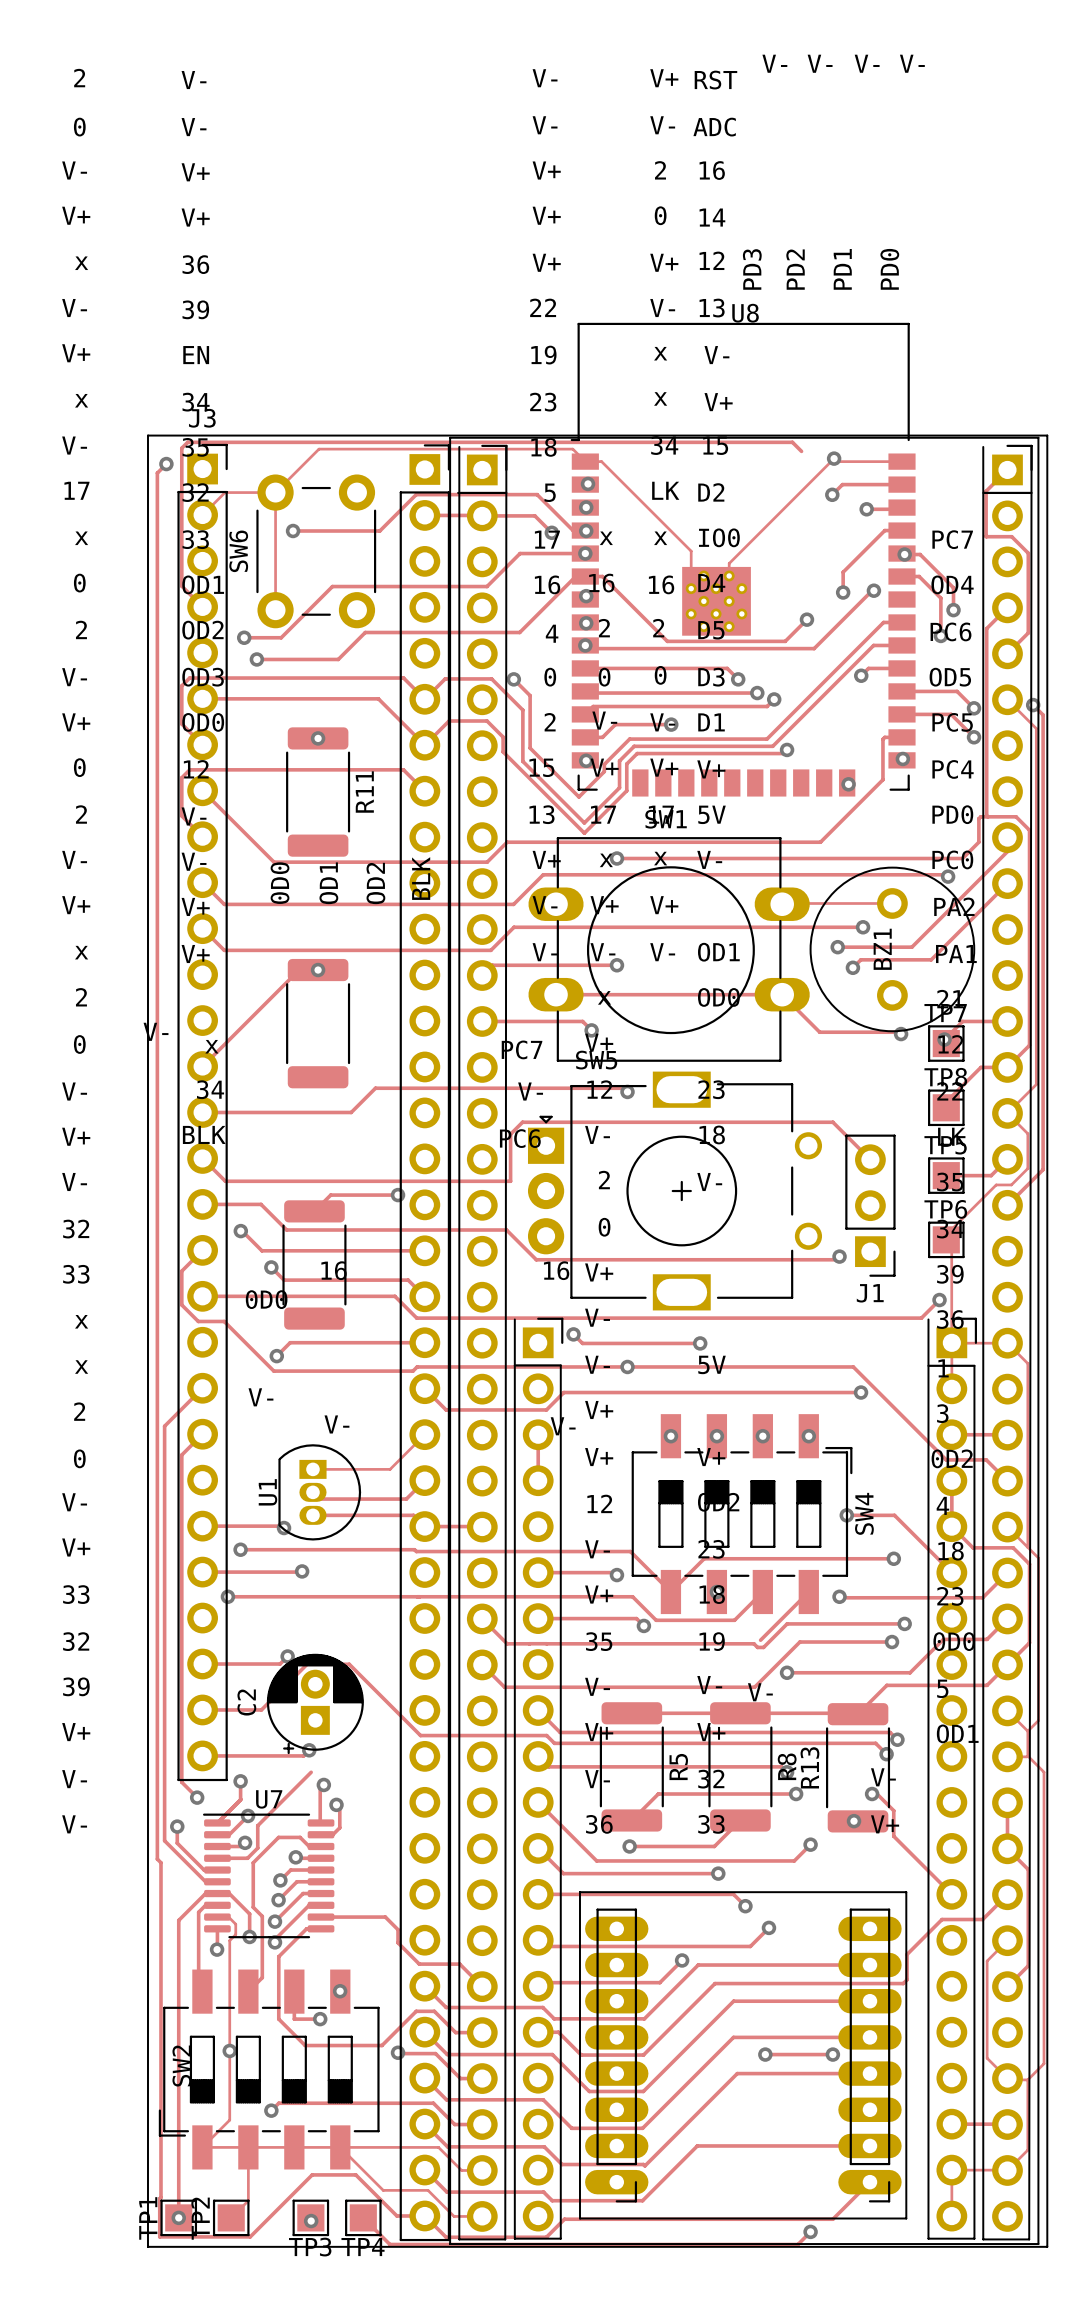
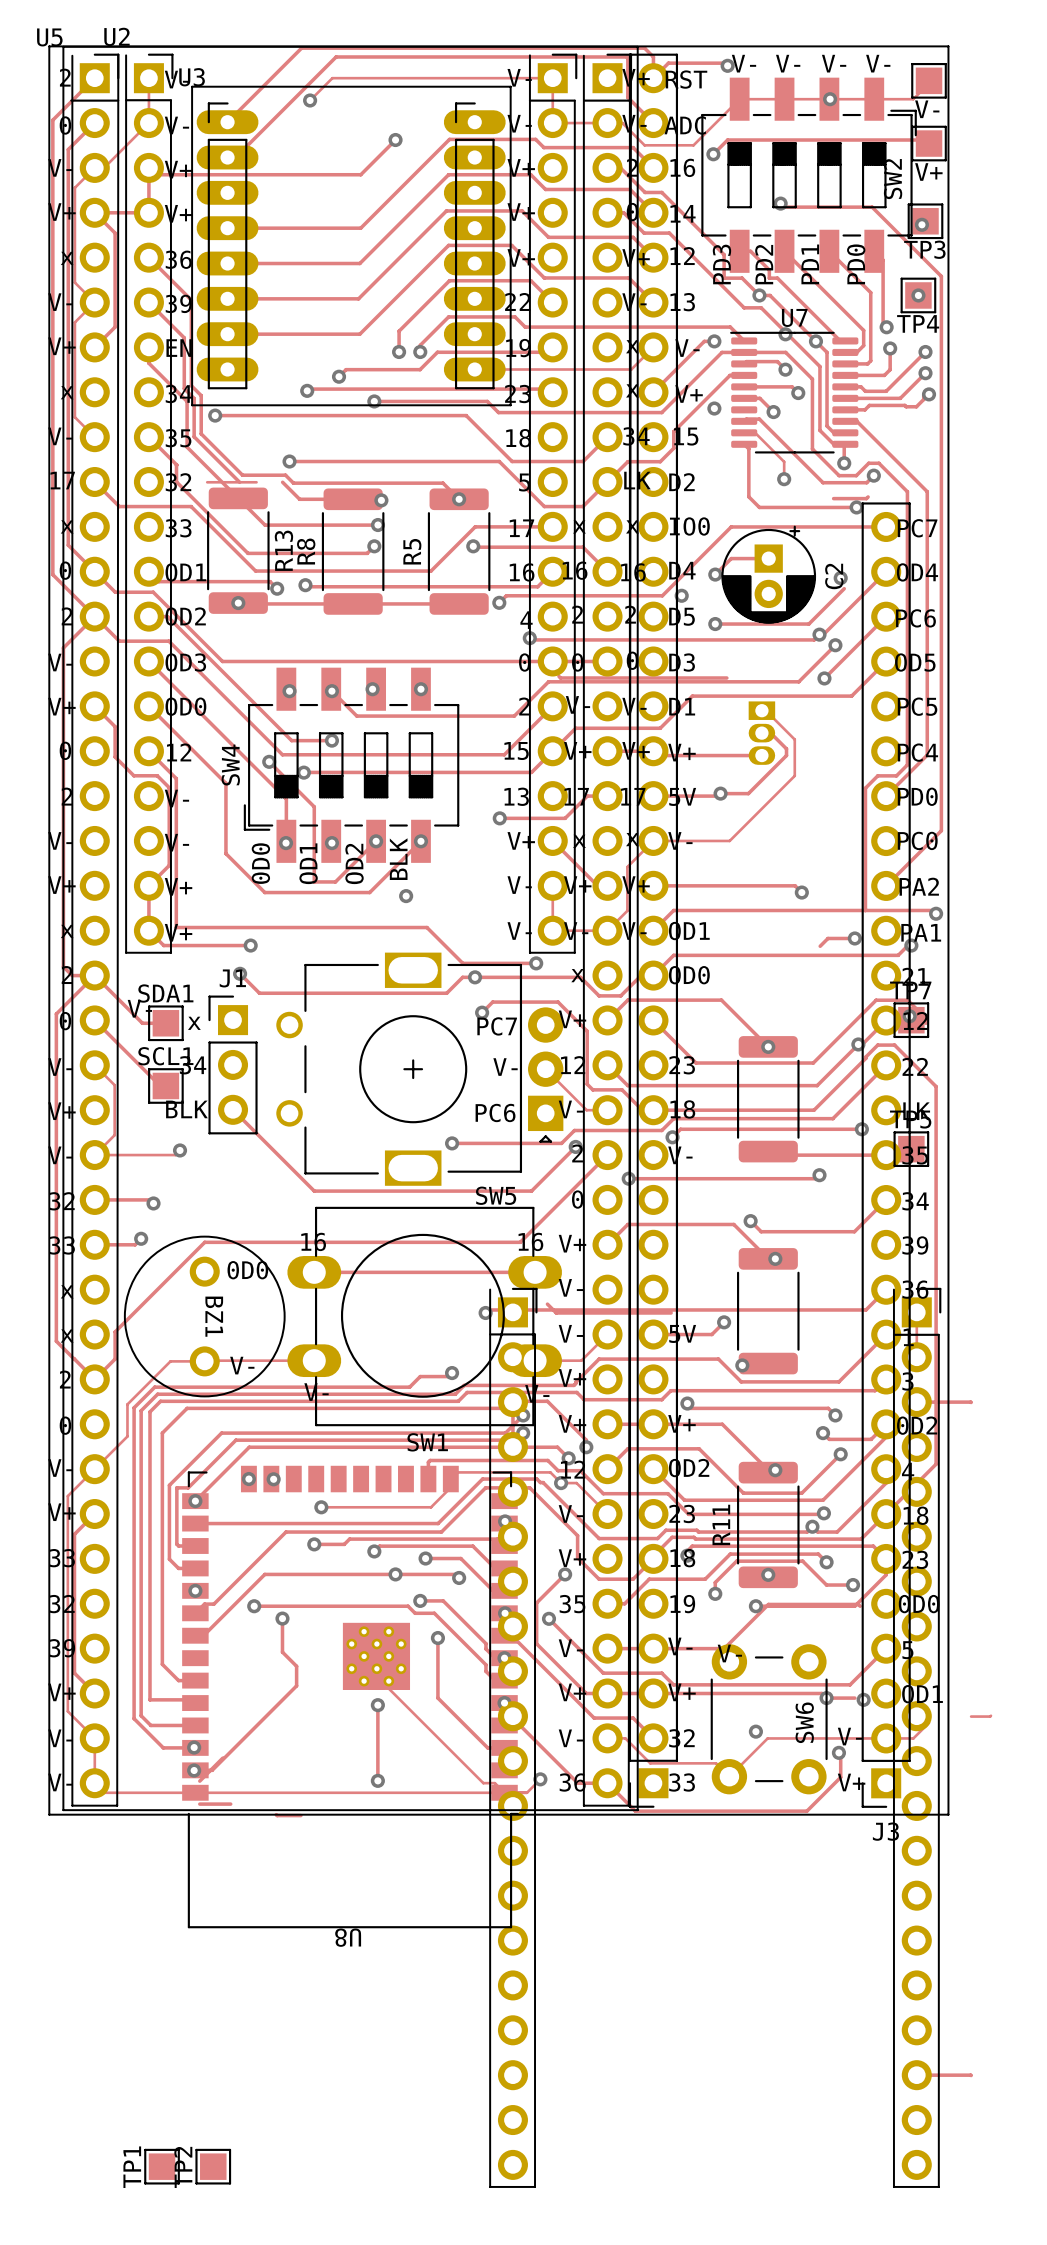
track: none -> (727, 65) (725, 63) (668, 63) (653, 78) (653, 56) (644, 48) (301, 48) (227, 122)
via: none -> (727, 65)
track: none -> (94, 78) (52, 120) (52, 574) (119, 641) (168, 641) (282, 754) (504, 754) (552, 706)
track: none -> (148, 78) (148, 123) (104, 167) (94, 167) (74, 187) (74, 282) (94, 302) (74, 322) (74, 417) (94, 437)
V-: none -> (929, 80)
track: none -> (929, 83) (913, 99) (739, 99) (693, 145) (644, 145) (622, 123) (552, 123) (552, 78) (332, 78) (310, 100)
via: none -> (830, 99)
via: none -> (310, 100)
track: none -> (94, 123) (68, 149) (68, 545) (115, 592) (153, 592) (222, 661) (607, 661)
track: none -> (653, 123) (627, 97) (626, 56) (336, 56) (235, 157) (227, 157)
track: none -> (395, 140) (360, 174) (155, 174) (148, 167) (148, 212) (94, 212) (115, 233) (115, 327) (94, 347)
via: none -> (395, 140)
track: none -> (929, 140) (727, 140) (713, 154)
V+: none -> (929, 143)
via: none -> (713, 154)
track: none -> (607, 167) (620, 167) (645, 192) (661, 192) (724, 254) (724, 278) (742, 278) (759, 295) (770, 295) (827, 352) (827, 426) (833, 432) (845, 432)
track: none -> (653, 167) (633, 147) (543, 147) (535, 139) (449, 139) (360, 228) (227, 228)
track: none -> (780, 203) (784, 207) (872, 207) (941, 276) (941, 830) (886, 885)
via: none -> (780, 203)
track: none -> (607, 212) (623, 212) (644, 233) (669, 233) (744, 307) (761, 307) (819, 366) (819, 430) (833, 444) (845, 444) (844, 463)
track: none -> (653, 212) (630, 189) (545, 189) (530, 174) (448, 174) (359, 263) (227, 263)
via: none -> (921, 224)
U3: none -> (351, 246)
track: none -> (739, 251) (750, 251) (769, 270) (769, 278) (777, 278) (840, 340) (845, 340)
track: none -> (784, 251) (863, 330) (863, 345) (856, 352) (845, 352)
track: none -> (829, 251) (870, 292) (870, 360) (867, 363) (845, 363)
track: none -> (874, 251) (883, 260) (883, 323) (886, 327)
track: none -> (148, 257) (191, 300) (191, 385) (201, 395) (201, 433) (242, 475) (285, 475) (293, 483) (443, 483) (459, 499)
track: none -> (653, 257) (633, 237) (548, 237) (522, 210) (446, 210) (358, 298) (227, 298)
via: none -> (759, 295)
via: none -> (918, 295)
track: none -> (148, 302) (184, 337) (184, 388) (194, 398) (194, 436) (239, 482)
track: none -> (552, 302) (530, 280) (449, 280) (399, 331) (399, 351)
track: none -> (653, 302) (628, 277) (544, 277) (511, 245) (448, 245) (359, 334) (227, 334)
via: none -> (886, 327)
via: none -> (785, 334)
track: none -> (744, 340) (730, 327) (525, 327) (515, 316) (448, 316) (420, 345) (420, 351)
track: none -> (714, 341) (704, 341) (653, 392)
via: none -> (714, 341)
via: none -> (815, 341)
track: none -> (148, 347) (148, 363) (187, 401) (187, 447) (265, 525) (377, 525)
track: none -> (552, 347) (547, 352) (437, 352) (420, 369) (346, 369) (339, 376)
track: none -> (653, 347) (631, 369) (474, 369)
track: none -> (890, 348) (890, 369) (884, 375) (845, 375)
via: none -> (890, 348)
via: none -> (399, 351)
via: none -> (420, 351)
track: none -> (925, 351) (886, 391) (865, 391) (861, 386) (845, 386)
via: none -> (925, 351)
track: none -> (744, 363) (746, 361) (777, 361) (785, 369)
via: none -> (785, 369)
track: none -> (925, 373) (900, 398) (845, 398)
via: none -> (925, 373)
track: none -> (744, 375) (730, 375) (673, 431) (673, 448) (660, 461) (627, 461) (582, 506) (544, 506) (499, 461) (289, 461)
via: none -> (339, 376)
track: none -> (744, 386) (792, 386) (798, 393)
track: none -> (307, 390) (308, 389) (549, 389) (552, 392)
via: none -> (307, 390)
via: none -> (798, 393)
track: none -> (929, 394) (923, 394) (923, 399) (916, 406) (869, 405) (864, 409) (845, 409)
via: none -> (929, 394)
track: none -> (744, 398) (759, 398) (773, 412)
track: none -> (374, 401) (487, 401) (498, 412) (661, 412) (722, 352) (785, 352) (812, 379) (812, 448) (839, 475) (856, 475) (868, 463) (878, 463) (907, 491) (907, 764) (896, 775) (877, 775) (865, 788) (865, 910)
via: none -> (374, 401)
via: none -> (714, 408)
via: none -> (773, 412)
track: none -> (215, 415) (466, 415) (512, 461) (583, 461) (607, 437)
via: none -> (215, 415)
track: none -> (744, 421) (746, 419) (759, 419) (823, 482) (866, 482) (873, 475)
track: none -> (845, 421) (856, 421) (927, 491) (927, 755) (886, 796)
board edge: (147, 435) (1047, 435) (1047, 2246) (147, 2246) (147, 435) -> (49, 46) (49, 1814) (948, 1814) (948, 46) (49, 46)
track: none -> (744, 432) (755, 432) (784, 461) (784, 479)
track: none -> (148, 437) (176, 465) (176, 481) (247, 553) (367, 553) (374, 546)
track: (801, 451) (792, 442) (187, 442) (181, 448) (181, 586) (202, 606) -> none
track: none -> (744, 444) (748, 448) (748, 496) (759, 507) (856, 507)
via: (834, 458) -> none
track: (902, 461) (837, 461) (834, 458) (729, 563) (729, 575) -> none
track: (166, 464) (157, 473) (157, 1443) -> (886, 1334) (838, 1381) (741, 1381) (718, 1359) (599, 1359) (573, 1385) (464, 1385) (455, 1394) (157, 1394) (141, 1410)
via: (166, 464) -> none
track: (1007, 469) (986, 491) (986, 536) (1011, 536) (1028, 553) (1028, 632) (1007, 653) -> none
via: none -> (289, 461)
via: none -> (844, 463)
via: (588, 483) -> none
track: (902, 484) (842, 484) (832, 494) -> none
via: none -> (873, 475)
track: none -> (94, 482) (119, 506) (191, 506) (255, 571) (431, 571) (475, 526) (552, 526)
track: (225, 492) (202, 515) -> none
track: none -> (282, 482) (299, 499) (381, 500)
via position: (832, 494) -> (784, 479)
via: (586, 507) -> none
via: none -> (459, 499)
via: (866, 509) -> none
via: none -> (381, 500)
U2: none -> (351, 503)
track: (424, 515) (534, 515) (551, 532) -> none
via: none -> (856, 507)
track: (293, 530) (379, 530) (416, 494) (537, 494) (573, 530) (586, 530) -> none
via: (293, 530) -> none
via: (586, 530) -> none
track: (902, 530) (884, 530) (843, 572) (843, 592) -> none
via: (551, 532) -> none
via: none -> (377, 525)
track: none -> (886, 526) (731, 526) (662, 595) (506, 595) (499, 602)
SW6 name position: SW6 (238, 551) -> SW6 (804, 1722)
SW6 position: (316, 551) -> (769, 1719)
track: (585, 553) (520, 553) (487, 586) (332, 586) (281, 637) (244, 637) -> none
via: (585, 553) -> none
track: (904, 554) (920, 554) (953, 587) (953, 610) -> none
via: (904, 554) -> none
via: none -> (374, 546)
track: none -> (473, 546) (582, 547) (607, 571)
via: none -> (473, 546)
U8 rotation: 0° (743, 559) -> 180° (350, 1697)
U8 position: (743, 559) -> (350, 1697)
track: none -> (768, 558) (731, 558) (715, 574)
track: (691, 575) (691, 551) (601, 461) (585, 461) (572, 449) (319, 449) (275, 492) (275, 610) -> none
track: (902, 576) (919, 576) (940, 598) (940, 635) -> none
track: none -> (148, 571) (158, 581) (270, 581) (277, 588)
track: none -> (552, 571) (537, 586) (307, 586) (305, 585)
track: none -> (886, 571) (823, 634) (819, 634) (814, 639) (531, 639) (529, 638)
via: none -> (715, 574)
track: (873, 590) (814, 648) (588, 648) (585, 645) (575, 645) -> none
via: (843, 592) -> none
via: (586, 596) -> none
via: none -> (305, 585)
via: none -> (277, 588)
track: none -> (844, 588) (808, 624) (715, 624)
track: (1007, 607) (986, 628) (987, 816) -> none
via: none -> (681, 595)
via: (953, 610) -> none
track: none -> (238, 603) (459, 603)
via: none -> (238, 603)
via: none -> (499, 602)
track: (806, 619) (785, 641) (667, 641) (602, 576) (575, 576) (519, 632) (365, 632) (338, 659) (256, 659) -> none
via: (806, 619) -> none
track: (902, 622) (883, 622) (766, 739) (629, 739) (604, 764) (604, 771) (578, 796) (530, 748) (530, 695) (513, 679) -> none
via: (586, 623) -> none
track: none -> (94, 616) (63, 647) (63, 966) (72, 975) (94, 975)
track: none -> (148, 616) (167, 616) (291, 740) (331, 740)
track: none -> (886, 616) (821, 681)
via: (940, 635) -> none
via: (244, 637) -> none
via: none -> (715, 624)
via: (585, 645) -> none
track: (902, 645) (873, 645) (772, 746) (634, 746) (619, 760) (619, 787) (584, 822) (522, 761) (522, 710) (491, 678) (445, 678) (424, 699) (403, 678) (189, 678) (181, 685) (181, 723) (202, 744) -> none
via: none -> (819, 634)
via: none -> (529, 638)
via: (256, 659) -> none
track: none -> (835, 645) (798, 681) (548, 681) (514, 716) (356, 716) (331, 689)
via: none -> (835, 645)
track: (585, 668) (727, 668) (738, 679) -> none
track: (902, 668) (868, 668) (861, 675) -> none
via: (861, 675) -> none
track: none -> (148, 661) (286, 798) (286, 843)
track: none -> (886, 661) (851, 696) (692, 696) (660, 728) (575, 728) (531, 772) (304, 772)
via: (513, 679) -> none
via: (738, 679) -> none
track: (902, 691) (957, 691) (974, 708) -> none
via: (757, 693) -> none
via: none -> (824, 678)
track: (202, 698) (378, 698) (424, 745) (449, 720) (487, 720) (503, 737) (503, 751) (584, 833) (626, 790) (626, 763) (637, 753) (783, 753) (787, 749) -> none
track: (774, 699) (767, 706) (593, 706) (585, 714) -> none
via: (774, 699) -> none
track: (1007, 699) (1036, 728) (1036, 1084) (1007, 1113) (1027, 1133) (1027, 1168) (1011, 1184) (996, 1184) (946, 1234) (946, 1239) -> none
via: none -> (372, 689)
via: none -> (420, 689)
track: (1033, 705) (1043, 715) (1043, 1169) (1007, 1205) -> none
via: (1033, 705) -> none
via: none -> (289, 691)
via: none -> (331, 691)
via: (974, 708) -> none
track: (902, 714) (951, 714) (974, 737) -> none
track: none -> (94, 706) (115, 726) (115, 756) (133, 775) (157, 775) (169, 787) (169, 865) (148, 885) (148, 930) (163, 945) (250, 945)
track: none -> (148, 706) (225, 783) (225, 853) (264, 892) (369, 892) (420, 841)
track: (671, 724) (615, 724) (602, 737) (585, 737) -> none
via: (671, 724) -> none
track: none -> (761, 710) (765, 710) (794, 739) (794, 775) (729, 840) (653, 840) (627, 867) (627, 910) (607, 930) (552, 930) (552, 885)
track: (902, 737) (884, 737) (882, 739) (882, 779) (820, 842) (507, 842) (487, 862) (273, 862) (202, 790) -> none
via: (974, 737) -> none
via: (318, 738) -> none
via: (787, 749) -> none
track: none -> (761, 733) (770, 733) (786, 748) (786, 755) (748, 793) (720, 793) (718, 796) (653, 796)
part: none -> (761, 733)
via: none -> (331, 740)
via: (902, 758) -> none
via: (586, 760) -> none
track: none -> (148, 751) (176, 778) (176, 927) (426, 927) (462, 963) (536, 963)
track: none -> (607, 751) (653, 751) (657, 755) (761, 755)
track: none -> (269, 761) (314, 806) (314, 881) (335, 881) (376, 841)
via: none -> (269, 761)
via: (848, 784) -> none
via: none -> (303, 772)
track: (424, 791) (403, 769) (189, 769) (181, 777) (181, 815) (202, 836) -> none
R11 position: (318, 792) -> (768, 1524)
R11 name position: R11 (364, 792) -> R11 (721, 1524)
via: none -> (720, 793)
track: none -> (607, 796) (587, 796) (565, 818) (499, 818)
via: none -> (499, 818)
track: (1007, 837) (1007, 851) (911, 947) (837, 947) -> none
track: (616, 858) (962, 858) (978, 842) (978, 818) (980, 816) (1016, 816) (1029, 830) (1029, 1045) (1007, 1067) (980, 1067) (940, 1107) -> none
via: (616, 858) -> none
track: none -> (552, 840) (597, 885) (607, 885)
via: none -> (376, 841)
via: none -> (420, 841)
via: none -> (286, 843)
via: none -> (331, 843)
track: (948, 874) (543, 874) (513, 904) (224, 904) (202, 882) -> none
via: (948, 876) -> none
track: (1007, 883) (931, 959) (888, 959) -> none
track: (892, 903) (782, 904) -> none
track: none -> (653, 885) (795, 885) (801, 892)
via: none -> (801, 892)
via: none -> (406, 896)
track: (863, 927) (514, 927) (490, 950) (224, 950) (202, 928) -> none
via: (863, 927) -> none
track: none -> (936, 913) (932, 910) (673, 910) (653, 930)
via: none -> (936, 913)
via: (837, 947) -> none
U5: none -> (350, 928)
SW1 rotation: 0° (669, 949) -> 180° (424, 1316)
SW1 position: (669, 949) -> (424, 1316)
BZ1 name rotation: 0° (882, 949) -> 180° (214, 1316)
BZ1 position: (892, 949) -> (204, 1316)
part: none -> (653, 930)
via: none -> (854, 938)
track: (616, 965) (492, 965) (482, 975) -> none
via: (616, 965) -> none
via: none -> (250, 945)
via: (852, 967) -> none
track: none -> (911, 945) (908, 945) (898, 955) (673, 955) (653, 975) (641, 975) (620, 995) (599, 995) (580, 977) (462, 977) (446, 993) (259, 993) (240, 973)
via: none -> (911, 945)
track: (318, 970) (299, 970) (202, 1066) -> none
via: (318, 970) -> none
via: none -> (536, 963)
track: (556, 994) (782, 994) (819, 1032) (899, 1032) (901, 1034) -> none
via: none -> (240, 973)
track: none -> (94, 975) (142, 1023) (165, 1023)
track: none -> (94, 975) (56, 1014) (56, 1341) (74, 1359)
via: none -> (475, 977)
track: (482, 1021) (582, 1021) (591, 1030) -> none
track: (1007, 1021) (962, 1021) (940, 1043) -> none
part: (318, 1023) -> none
via: (591, 1030) -> none
via position: (901, 1034) -> (858, 1044)
track: none -> (482, 1012) (492, 1002) (558, 1002) (587, 1031) (587, 1084) (592, 1089) (622, 1089) (642, 1110) (814, 1110) (877, 1045) (894, 1045) (936, 1086) (936, 1464) (861, 1539) (695, 1539) (693, 1537) (672, 1537) (633, 1579) (599, 1579) (577, 1557) (577, 1535) (529, 1487) (485, 1487) (441, 1532) (286, 1532) (282, 1535)
via: none -> (482, 1012)
track: none -> (94, 1020) (160, 1085) (165, 1085)
track: none -> (607, 1020) (627, 1000) (721, 1000) (768, 1046)
track: none -> (653, 1020) (696, 1063) (813, 1063) (876, 1000) (907, 1000) (925, 1018) (925, 1023)
track: none -> (886, 1020) (862, 1044) (858, 1044) (817, 1085) (627, 1085) (607, 1065)
SDA1: none -> (165, 1023)
via: none -> (768, 1046)
track: none -> (94, 1065) (114, 1085) (114, 1135) (94, 1155) (175, 1155) (180, 1150)
track: none -> (886, 1065) (832, 1118) (673, 1118) (661, 1130) (574, 1130) (561, 1143) (452, 1143)
track: (627, 1091) (623, 1088) (375, 1088) (351, 1112) (202, 1112) -> none
via: (627, 1091) -> none
track: none -> (545, 1069) (586, 1110) (607, 1110)
TP8: (946, 1107) -> none
SCL1: none -> (165, 1085)
J3 rotation: 0° (202, 1112) -> 180° (886, 1155)
part: none -> (768, 1099)
track: none -> (233, 1109) (314, 1191) (531, 1191) (575, 1146)
track: none -> (861, 1129) (680, 1129) (672, 1137)
via: none -> (861, 1129)
track: (202, 1158) (225, 1181) (510, 1181) (510, 1134) (522, 1122) (832, 1122) (870, 1159) -> none
track: (1007, 1159) (991, 1175) (940, 1175) -> none
via: none -> (672, 1137)
via: none -> (575, 1146)
via: none -> (180, 1150)
track: none -> (768, 1151) (771, 1155) (886, 1155)
track: none -> (607, 1155) (520, 1242) (204, 1242) (115, 1331) (115, 1359) (94, 1379) (74, 1359)
SW5 rotation: 0° (675, 1191) -> 180° (419, 1069)
SW5 position: (675, 1191) -> (419, 1069)
track: (398, 1195) (330, 1195) (314, 1211) -> none
via position: (398, 1195) -> (452, 1143)
track: none -> (819, 1175) (815, 1178) (628, 1178)
via: none -> (819, 1175)
track: (202, 1204) (261, 1204) (286, 1229) (506, 1229) (536, 1259) (836, 1259) (839, 1256) -> none
via: none -> (628, 1178)
J1 rotation: 0° (870, 1205) -> 180° (233, 1064)
J1 position: (870, 1205) -> (233, 1064)
track: none -> (94, 1199) (149, 1199) (153, 1203)
track: none -> (886, 1200) (854, 1231) (761, 1231) (750, 1221)
via: none -> (153, 1203)
track: (240, 1231) (261, 1250) (424, 1250) -> none
via: (240, 1231) -> none
track: (940, 1239) (951, 1251) (951, 1342) (1007, 1343) (1027, 1363) (1027, 1547) -> none
TP6: (946, 1239) -> none
via: none -> (750, 1221)
track: (202, 1250) (181, 1271) (181, 1304) (198, 1321) (224, 1321) (273, 1371) (413, 1371) (417, 1366) (853, 1366) (946, 1459) (986, 1459) (1007, 1481) -> none
via: (839, 1256) -> none
part: (314, 1264) -> none
track: none -> (141, 1238) (135, 1244) (94, 1244)
via: none -> (141, 1238)
track: (271, 1267) (284, 1280) (408, 1280) (424, 1296) -> none
via: (271, 1267) -> none
track: none -> (607, 1244) (627, 1224) (733, 1224) (768, 1258) (775, 1258)
via: none -> (775, 1258)
track: (202, 1296) (394, 1296) (416, 1318) (921, 1318) (939, 1300) -> none
via: (939, 1300) -> none
track: none -> (314, 1272) (535, 1272)
track: none -> (886, 1289) (865, 1309) (488, 1309) (485, 1312)
via: (573, 1334) -> none
part: (744, 1340) -> none
part: none -> (768, 1311)
track: (424, 1342) (290, 1342) (276, 1356) -> none
part: (424, 1342) -> none
via: none -> (485, 1312)
via: (700, 1343) -> none
track: none -> (724, 1322) (711, 1334) (653, 1334)
via: none -> (724, 1322)
via: (276, 1356) -> none
track: none -> (607, 1334) (581, 1360) (535, 1360)
via: (627, 1366) -> none
track: (202, 1388) (164, 1426) (164, 1840) (205, 1881) (217, 1881) -> none
track: (424, 1388) (446, 1409) (546, 1409) (563, 1392) (861, 1392) -> none
track: none -> (205, 1360) (314, 1360)
via: (861, 1392) -> none
track: none -> (204, 1361) (170, 1361) (127, 1404) (127, 1436) (67, 1496) (67, 1711) (94, 1738) (94, 1783) (104, 1792) (526, 1792) (540, 1779)
via: none -> (742, 1365)
track: none -> (452, 1373) (448, 1376) (420, 1376) (409, 1387) (154, 1387) (134, 1407) (134, 1718) (163, 1747) (195, 1747)
via: none -> (452, 1373)
track: none -> (886, 1379) (874, 1390) (670, 1390) (661, 1399) (584, 1399) (576, 1392) (467, 1392) (458, 1401) (160, 1401) (149, 1411) (149, 1699) (192, 1699) (195, 1703)
track: (202, 1434) (181, 1455) (181, 1782) (197, 1797) -> none
track: (424, 1434) (390, 1469) (312, 1469) -> none
via: (670, 1436) -> none
via: (762, 1436) -> none
via: (808, 1436) -> none
track: none -> (688, 1408) (828, 1408) (835, 1415)
track: none -> (523, 1415) (505, 1433) (221, 1433) (169, 1485) (169, 1559) (178, 1568) (195, 1568)
via: none -> (523, 1415)
via: none -> (835, 1415)
track: none -> (607, 1424) (722, 1424) (768, 1470)
track: none -> (523, 1433) (516, 1440) (235, 1440) (188, 1487) (176, 1487) (176, 1544) (178, 1545) (195, 1545)
via: none -> (523, 1433)
track: none -> (823, 1433) (829, 1439) (871, 1439) (886, 1424) (886, 1437) (823, 1500) (684, 1500) (653, 1469)
via: none -> (823, 1433)
track: (424, 1480) (406, 1499) (319, 1499) (312, 1492) -> none
track: none -> (586, 1447) (586, 1440) (547, 1401) (519, 1401) (512, 1408) (187, 1408) (162, 1433) (162, 1664) (178, 1680) (195, 1680)
via: none -> (586, 1447)
track: (951, 1480) (951, 1526) (973, 1547) (1013, 1547) (1029, 1564) (1029, 1642) (987, 1685) (886, 1685) (858, 1714) (631, 1713) -> none
track: none -> (840, 1454) (801, 1493) (743, 1493) (699, 1448) (627, 1448) (607, 1469)
via: none -> (840, 1454)
U1: (319, 1492) -> none
track: none -> (568, 1458) (557, 1447) (249, 1447) (195, 1501)
via: none -> (568, 1458)
track: none -> (886, 1469) (886, 1483) (837, 1532) (817, 1532) (812, 1526) (807, 1532) (665, 1530) (657, 1538) (599, 1538) (543, 1482) (536, 1479) (482, 1479) (438, 1523) (195, 1523)
via: none -> (775, 1470)
via: none -> (248, 1479)
track: none -> (428, 1479) (428, 1462) (430, 1460) (547, 1460) (558, 1470) (580, 1470) (603, 1493) (668, 1493) (688, 1514) (823, 1513)
SW4 rotation: 0° (742, 1514) -> 180° (351, 765)
SW4 position: (742, 1514) -> (351, 765)
track: (312, 1515) (413, 1515) (424, 1526) (482, 1527) -> none
track: (846, 1515) (894, 1515) (951, 1572) -> none
via: (846, 1515) -> none
via: none -> (561, 1483)
track: (202, 1526) (282, 1526) (284, 1528) -> none
track: (1007, 1527) (1038, 1558) (1038, 1720) (1027, 1731) -> none
via position: (284, 1528) -> (273, 1479)
via: none -> (195, 1501)
track: none -> (321, 1507) (431, 1507) (450, 1487) (450, 1479) (457, 1472) (550, 1472) (561, 1483) (576, 1483) (607, 1514)
via: none -> (321, 1507)
via: none -> (823, 1513)
track: none -> (94, 1514) (74, 1534) (74, 1673) (94, 1693)
track: (240, 1549) (630, 1551) (670, 1592) (704, 1558) (893, 1558) -> none
via: (240, 1549) -> none
via: none -> (505, 1521)
via: (893, 1558) -> none
via: none -> (812, 1526)
via: (302, 1571) -> none
track: (202, 1572) (301, 1572) -> (195, 1613) (204, 1604) (213, 1604) (281, 1536)
track: (538, 1572) (614, 1572) (616, 1575) -> none
track: (1007, 1573) (982, 1597) (839, 1596) -> none
via: (616, 1575) -> none
track: none -> (314, 1544) (344, 1544) (349, 1539) (497, 1539) (504, 1545)
via: none -> (314, 1544)
track: none -> (688, 1549) (692, 1546) (873, 1546) (886, 1558) (886, 1574) (854, 1606) (755, 1606)
track: none -> (374, 1551) (379, 1546) (472, 1546) (495, 1568) (504, 1568)
via: none -> (374, 1551)
track: (762, 1592) (734, 1620) (656, 1620) (632, 1596) (227, 1596) -> none
track: (808, 1592) (760, 1640) -> none
track: none -> (425, 1558) (460, 1558) (493, 1590) (504, 1590)
via: none -> (425, 1558)
via: (227, 1596) -> none
via: (839, 1596) -> none
track: none -> (826, 1562) (818, 1554) (730, 1554) (705, 1579) (649, 1579) (624, 1603) (607, 1603)
via: none -> (826, 1562)
via: none -> (395, 1574)
track: none -> (565, 1574) (536, 1602) (536, 1643) (586, 1693) (821, 1693) (826, 1698) (854, 1698)
via: none -> (565, 1574)
via: none -> (768, 1574)
track: none -> (459, 1577) (455, 1574) (264, 1574) (203, 1635) (195, 1635)
via: none -> (459, 1577)
track: (482, 1618) (507, 1643) (753, 1643) (757, 1647) (763, 1647) (787, 1623) (904, 1623) -> none
track: (538, 1618) (636, 1618) (643, 1625) -> none
track: (1007, 1618) (987, 1639) (943, 1639) (910, 1672) (787, 1672) -> none
track: none -> (853, 1585) (826, 1585) (802, 1561) (736, 1561) (715, 1582) (715, 1593)
via: none -> (853, 1585)
via: (904, 1623) -> none
via: (643, 1625) -> none
via: none -> (195, 1590)
via: none -> (715, 1593)
track: none -> (420, 1600) (443, 1600) (485, 1643) (485, 1648) (495, 1658) (504, 1658)
via: none -> (420, 1600)
via: (892, 1642) -> none
track: none -> (254, 1606) (408, 1606) (415, 1613) (434, 1613) (485, 1664) (485, 1671) (495, 1680) (504, 1680)
via: none -> (254, 1606)
via: none -> (505, 1613)
track: (287, 1656) (280, 1664) (202, 1664) -> none
via: (287, 1656) -> none
track: none -> (282, 1618) (282, 1652) (296, 1666) (296, 1685) (212, 1770) (194, 1770)
via: none -> (282, 1618)
track: none -> (548, 1618) (603, 1673) (661, 1673) (673, 1684) (850, 1684) (886, 1648)
via: none -> (548, 1618)
track: (482, 1664) (504, 1687) (635, 1687) -> none
via position: (787, 1672) -> (755, 1606)
track: none -> (504, 1635) (511, 1635) (594, 1718) (633, 1718) (653, 1738)
track: none -> (437, 1638) (437, 1698) (487, 1747) (504, 1747)
via: none -> (437, 1638)
via: none -> (504, 1658)
C2 rotation: 0° (315, 1703) -> 180° (768, 574)
C2 position: (315, 1703) -> (768, 574)
track: (202, 1709) (261, 1709) (307, 1664) (349, 1664) (420, 1735) (546, 1735) (554, 1743) (875, 1743) (886, 1754) -> none
track: (538, 1710) (560, 1732) (890, 1732) (897, 1739) -> none
track: (1007, 1710) (1027, 1731) -> none
track: none -> (388, 1681) (388, 1688) (483, 1783) (494, 1783) (504, 1792)
track: (1027, 1731) (1027, 1756) (1044, 1772) (1044, 2063) (1027, 2079) -> none
via: none -> (504, 1703)
track: none -> (377, 1705) (377, 1780)
via: none -> (377, 1705)
track: (309, 1750) (303, 1755) (202, 1755) -> none
via: (309, 1750) -> none
via position: (886, 1754) -> (826, 1698)
track: (157, 1756) (157, 1859) (160, 1862) (159, 2236) (250, 2236) (312, 2174) (355, 2174) (396, 2215) (424, 2215) (446, 2237) (546, 2237) (564, 2219) (832, 2219) (869, 2182) -> (141, 1715) (150, 1725) (195, 1725)
track: (538, 1756) (548, 1766) (781, 1766) (787, 1772) -> none
track: none -> (929, 1722) (913, 1738) (767, 1738) (729, 1776) (716, 1763) (650, 1763) (625, 1738) (607, 1738)
track: none -> (504, 1725) (520, 1725) (577, 1783) (607, 1783) (635, 1811) (806, 1811) (840, 1777) (840, 1758)
R5 position: (631, 1766) -> (459, 551)
R8 position: (740, 1766) -> (353, 551)
R8 name position: R8 (787, 1766) -> R8 (306, 551)
R5 name position: R5 (678, 1767) -> R5 (412, 551)
R13 name position: R13 (809, 1767) -> R13 (283, 550)
R13 position: (858, 1767) -> (238, 550)
track: (311, 1772) (257, 1825) (257, 1848) (247, 1858) (217, 1858) -> none
track: (240, 1781) (240, 1799) -> none
via: (240, 1781) -> none
track: (323, 1784) (320, 1788) (321, 1822) -> none
via: (323, 1784) -> none
via: none -> (194, 1747)
track: (796, 1794) (658, 1794) (631, 1820) -> none
via: (796, 1794) -> none
track: (872, 1794) (877, 1794) (893, 1810) (893, 1836) (951, 1894) -> none
via: (197, 1797) -> none
track: (538, 1802) (596, 1860) (794, 1860) (810, 1844) -> none
track: (1007, 1802) (1007, 1848) (1028, 1869) (1028, 1965) (1007, 1986) -> none
track: (336, 1804) (339, 1808) (339, 1827) (332, 1834) (321, 1834) -> none
via: (336, 1804) -> none
via: none -> (194, 1770)
track: (248, 1815) (229, 1834) (217, 1834) -> none
via: (248, 1815) -> none
track: (740, 1820) (714, 1846) (629, 1846) -> none
via: (854, 1821) -> none
via: none -> (377, 1780)
track: (177, 1826) (177, 1843) (204, 1870) (217, 1870) -> none
via: (177, 1826) -> none
via: (245, 1842) -> none
via: (810, 1844) -> none
track: (321, 1846) (309, 1846) (300, 1837) (278, 1837) (253, 1862) (253, 1907) (262, 1916) (262, 1977) (248, 1991) -> none
via position: (629, 1846) -> (540, 1779)
track: (538, 1848) (563, 1873) (718, 1873) -> none
via: (295, 1857) -> none
track: (321, 1870) (290, 1870) (280, 1880) -> none
via: (718, 1873) -> none
U7 position: (268, 1875) -> (794, 392)
via: (280, 1880) -> none
track: (321, 1881) (296, 1881) (278, 1900) -> none
track: (321, 1893) (303, 1893) (274, 1921) -> none
track: (538, 1894) (733, 1894) (745, 1906) -> none
track: (1007, 1894) (982, 1919) (942, 1919) (907, 1954) (907, 1979) (903, 1983) (714, 1983) (643, 2055) (581, 2055) (558, 2032) (538, 2032) -> none
via: (278, 1900) -> none
track: (217, 1905) (205, 1905) (198, 1912) (198, 1987) (202, 1991) -> none
track: (321, 1905) (309, 1905) (274, 1939) (274, 1942) -> none
via: (745, 1906) -> none
track: (217, 1917) (228, 1917) (235, 1924) (235, 1934) (229, 1940) (229, 2120) (202, 2147) (438, 2147) (461, 2170) (482, 2170) -> none
track: (321, 1917) (385, 1917) (398, 1929) (398, 1942) (419, 1964) (459, 1964) (482, 1986) -> none
via: (274, 1921) -> none
track: (768, 1927) (750, 1946) (544, 1946) (538, 1940) -> none
via: (768, 1927) -> none
track: (217, 1928) (217, 1949) -> none
track: (321, 1928) (306, 1928) (278, 1956) (278, 2019) (305, 2045) (382, 2045) (416, 2011) (434, 2011) (455, 2032) (482, 2032) -> none
track: (249, 1936) (249, 1913) (229, 1893) (205, 1893) (178, 1920) (178, 2217) -> none
via: (249, 1936) -> none
track: (1007, 1940) (987, 1961) (987, 2058) (1008, 2079) (1027, 2079) -> none
via: (274, 1942) -> none
via: (217, 1949) -> none
track: (682, 1960) (659, 1982) (541, 1982) (538, 1986) -> none
via: (682, 1960) -> none
track: (869, 1965) (698, 1965) (644, 2018) (554, 2018) (542, 2007) (446, 2007) (424, 1986) -> none
track: (294, 1991) (294, 2019) (320, 2019) -> none
via: (340, 1991) -> none
track: (880, 2001) (733, 2001) (643, 2091) (589, 2091) (552, 2054) (447, 2054) (424, 2032) -> none
via: (320, 2019) -> none
track: (869, 2037) (733, 2037) (642, 2128) (571, 2128) (543, 2099) (446, 2099) (424, 2078) -> none
via: (229, 2050) -> none
track: (398, 2052) (435, 2053) (460, 2078) (482, 2078) -> none
via: (398, 2052) -> none
track: (765, 2054) (832, 2054) -> none
via: (765, 2054) -> none
via: (832, 2054) -> none
part: (743, 2055) -> none
SW2 rotation: 0° (269, 2069) -> 180° (809, 175)
SW2 position: (269, 2069) -> (809, 175)
track: (869, 2073) (737, 2073) (644, 2165) (562, 2164) (544, 2146) (447, 2146) (424, 2124) -> none
track: (1027, 2079) (1027, 2150) (1007, 2170) (951, 2170) (951, 2216) -> none
track: (271, 2110) (278, 2103) (433, 2103) (454, 2124) (482, 2124) -> none
via: (271, 2110) -> none
track: (869, 2145) (697, 2145) (642, 2200) (552, 2200) (543, 2192) (446, 2192) (424, 2170) -> none
track: (248, 2147) (248, 2200) (231, 2217) -> none
track: (340, 2147) (383, 2190) (428, 2190) (454, 2216) (482, 2216) -> none
via: (178, 2217) -> none
TP3 position: (310, 2217) -> (925, 221)
track: (363, 2217) (389, 2244) (797, 2244) (810, 2231) -> none
TP4 position: (363, 2217) -> (918, 295)
via: (311, 2221) -> none
via: (810, 2231) -> none

